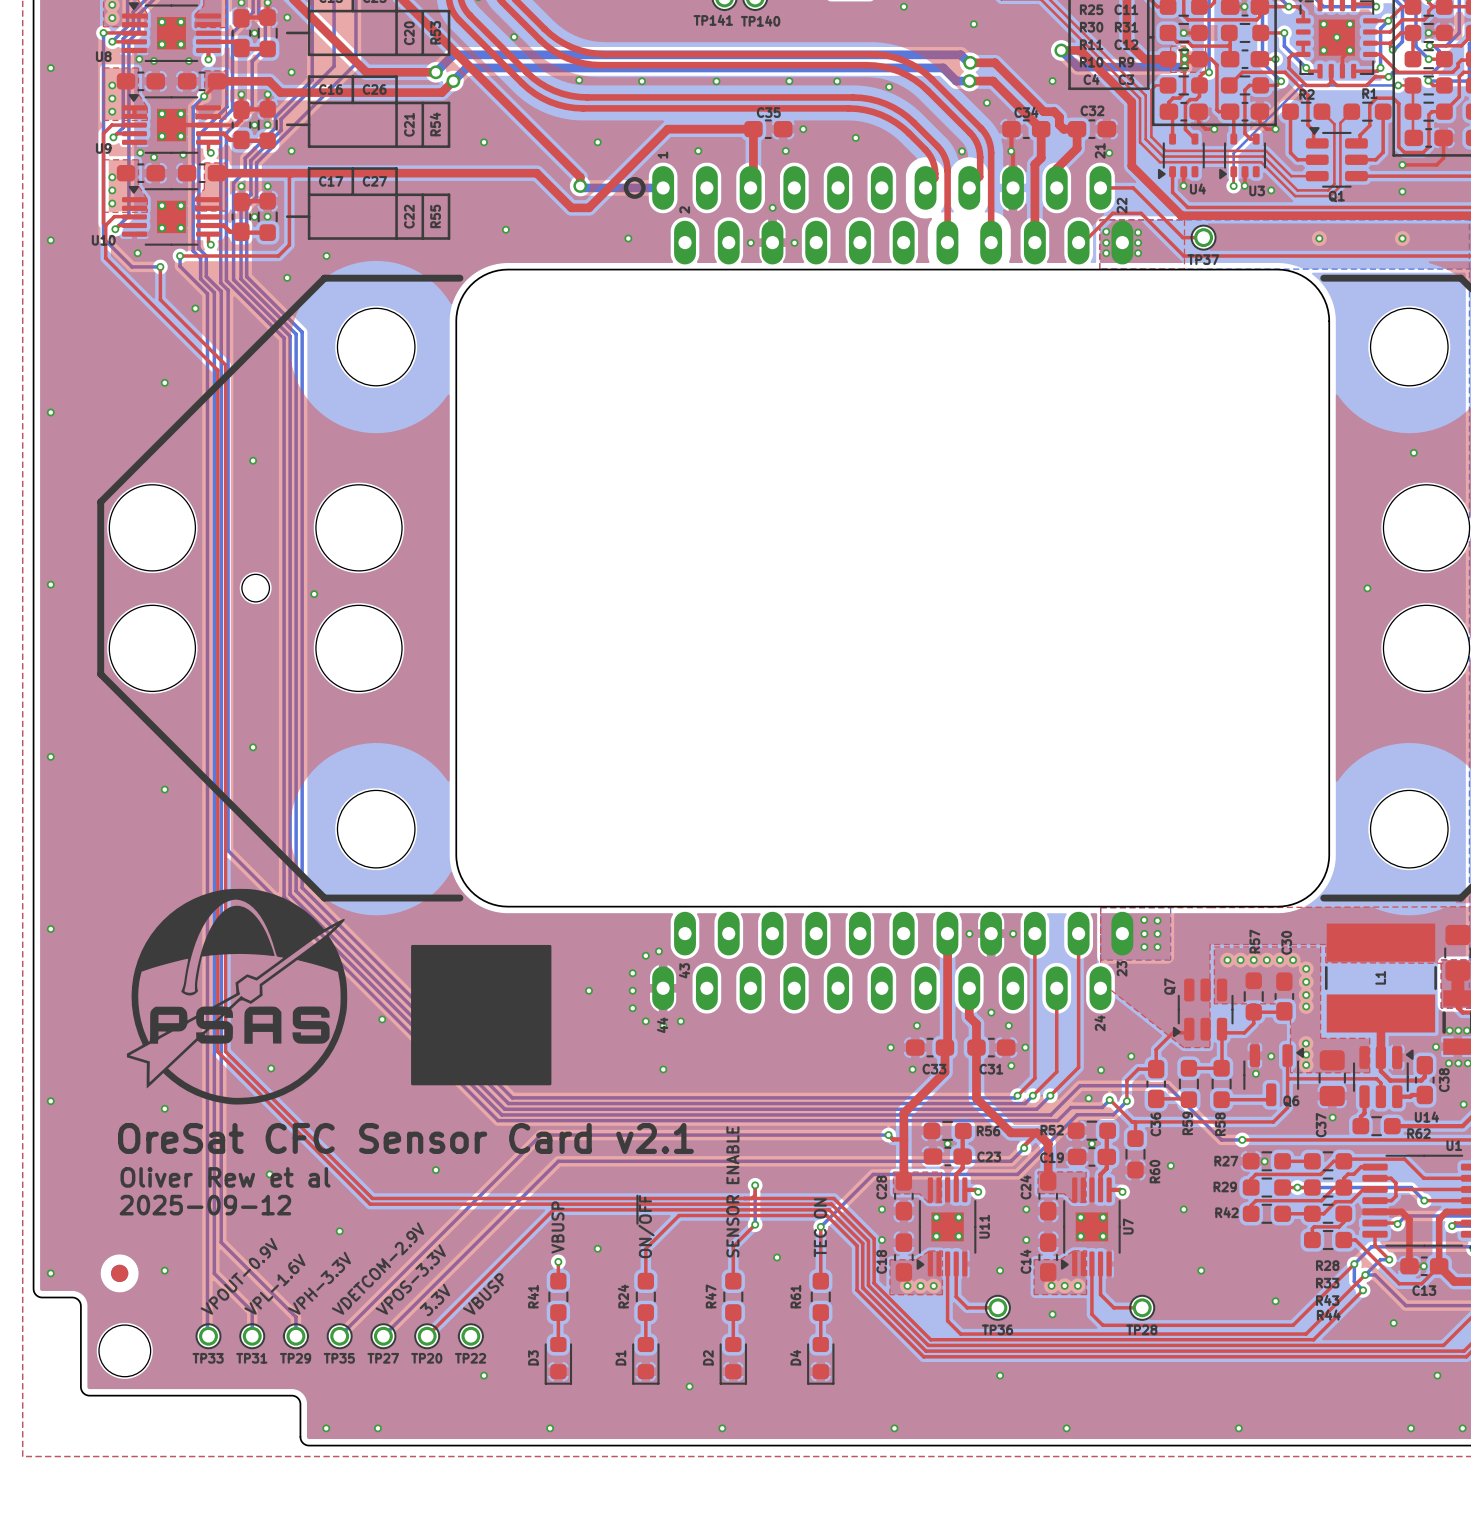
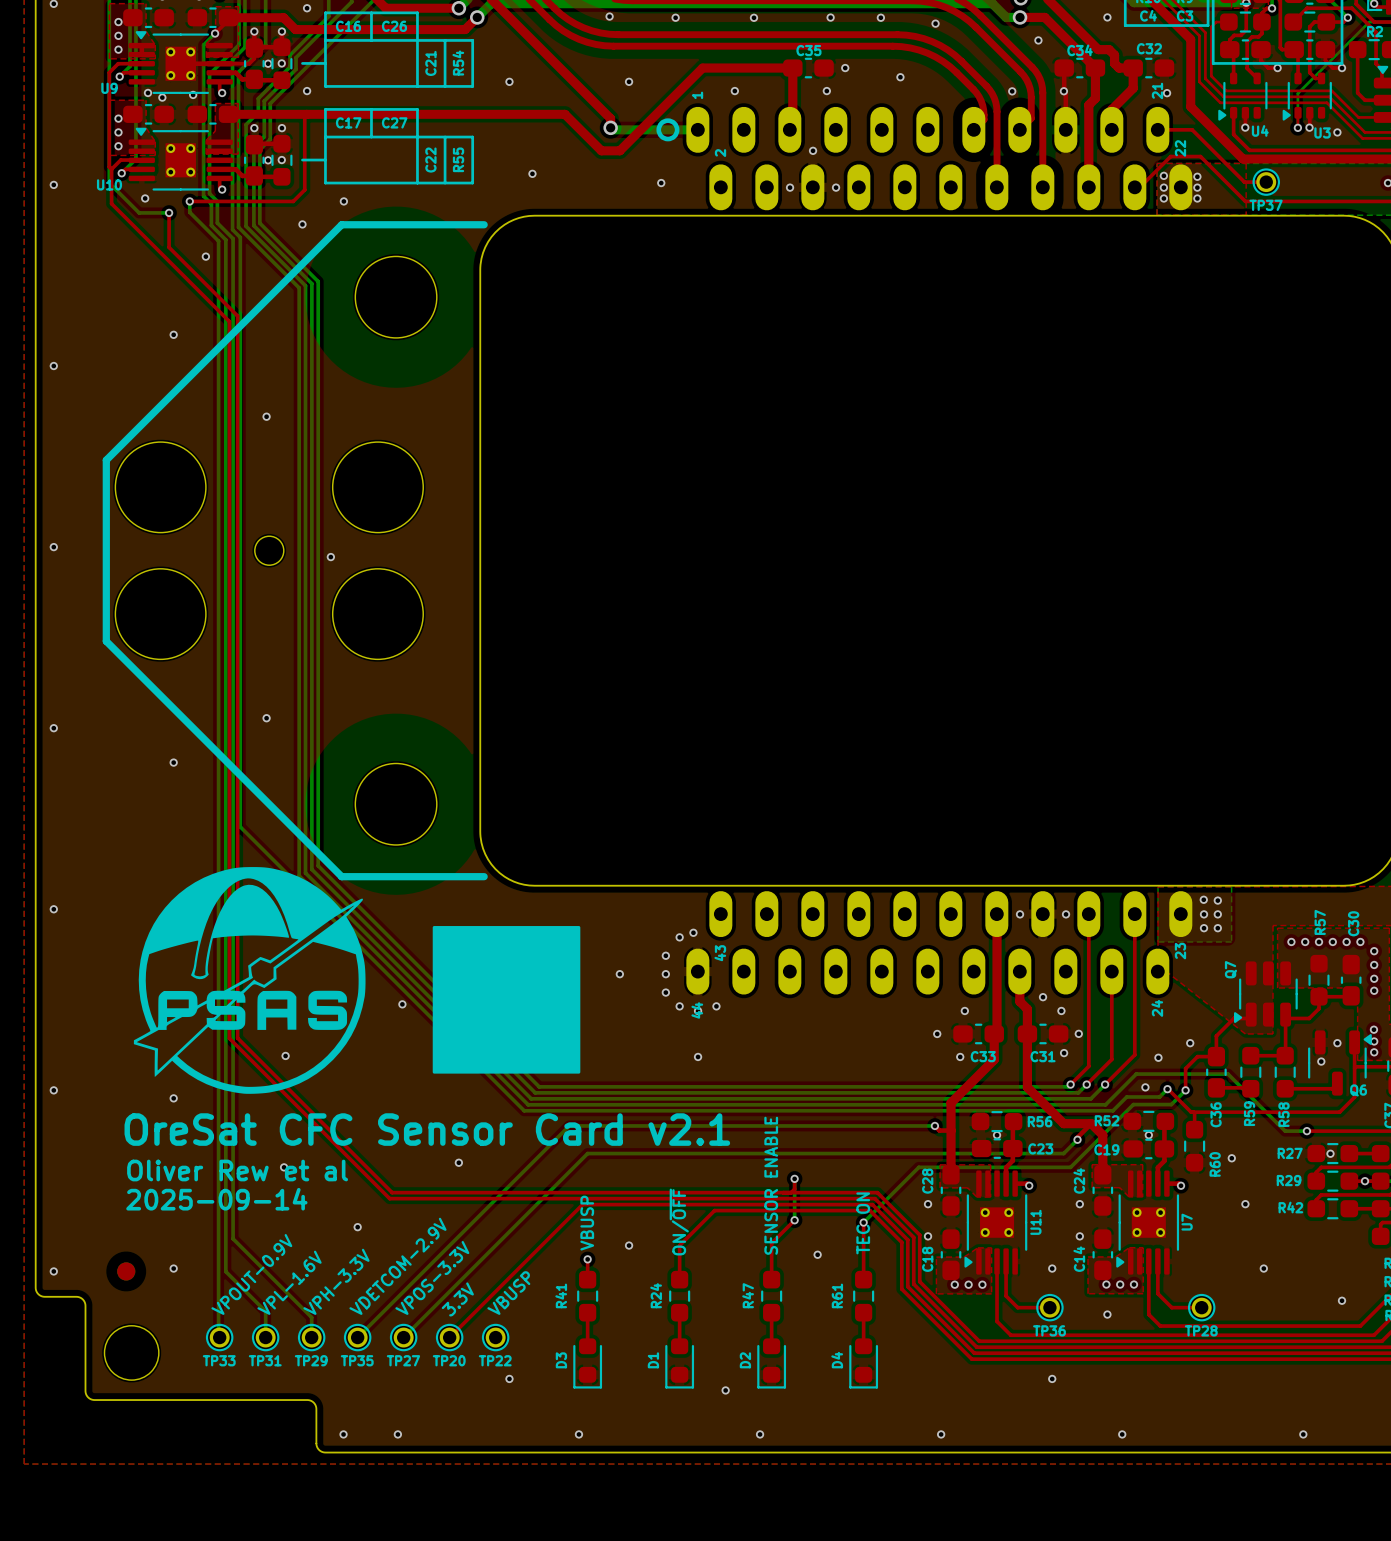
text: 2025-09-12 (205, 1205) -> 2025-09-14 (216, 1199)

